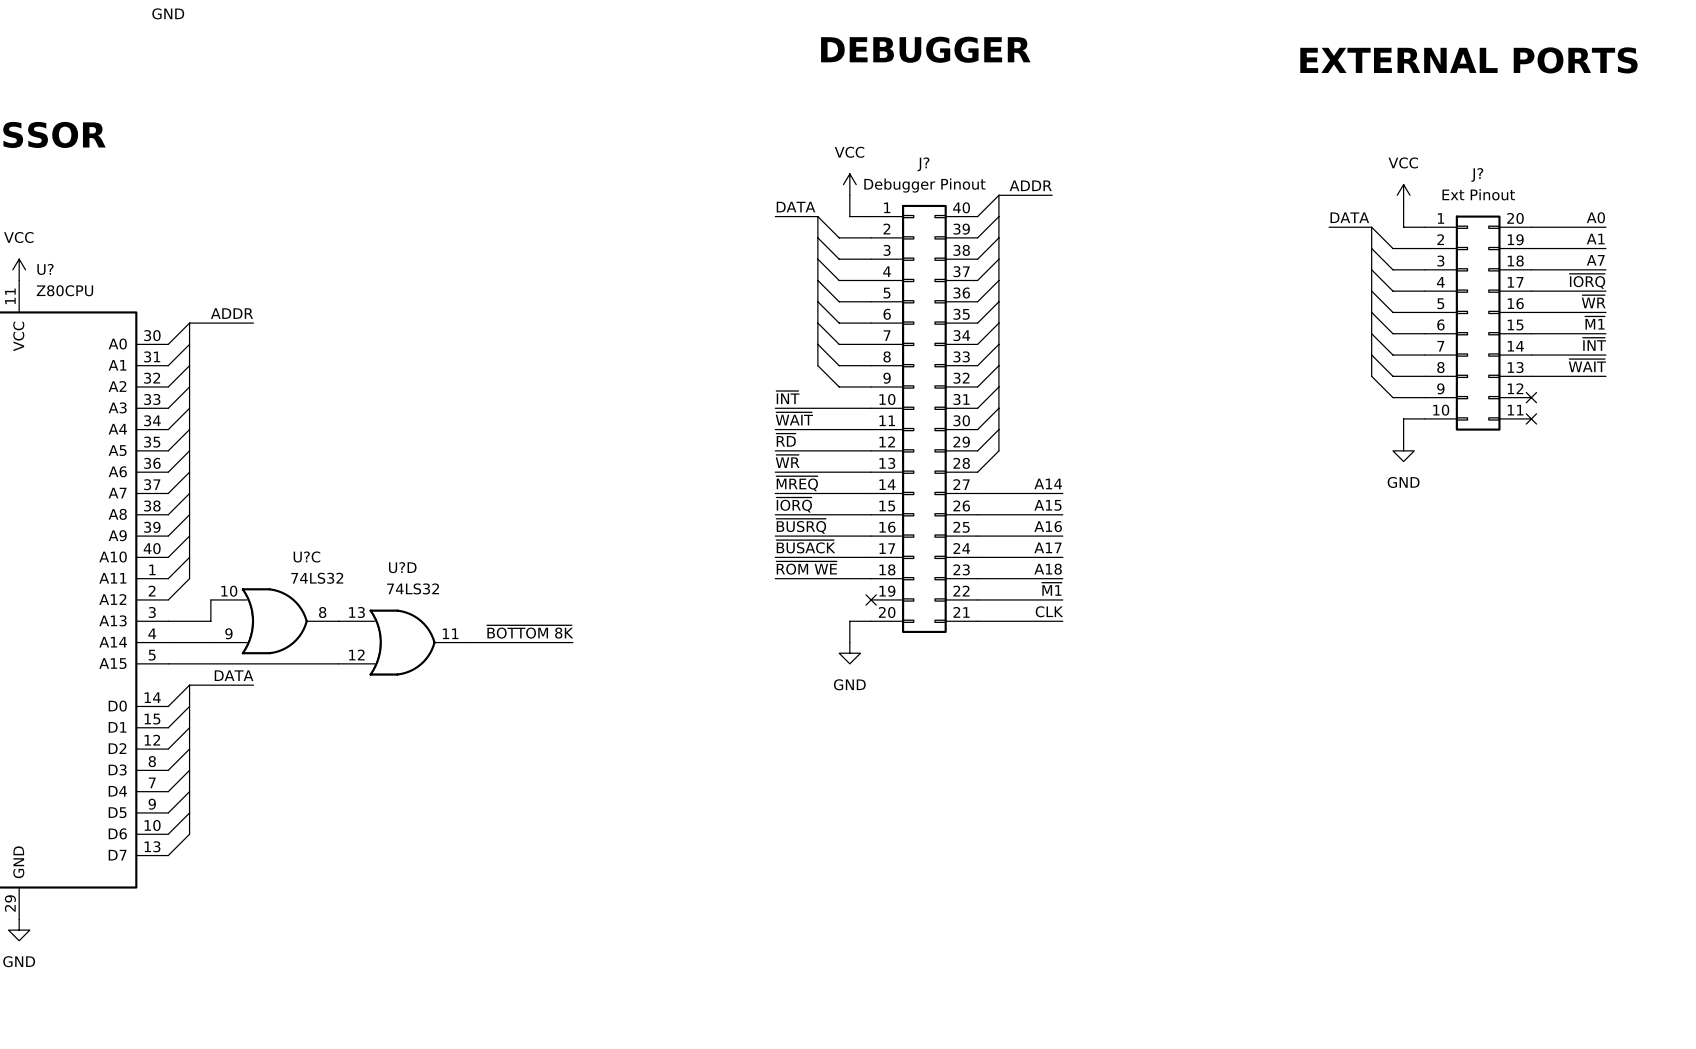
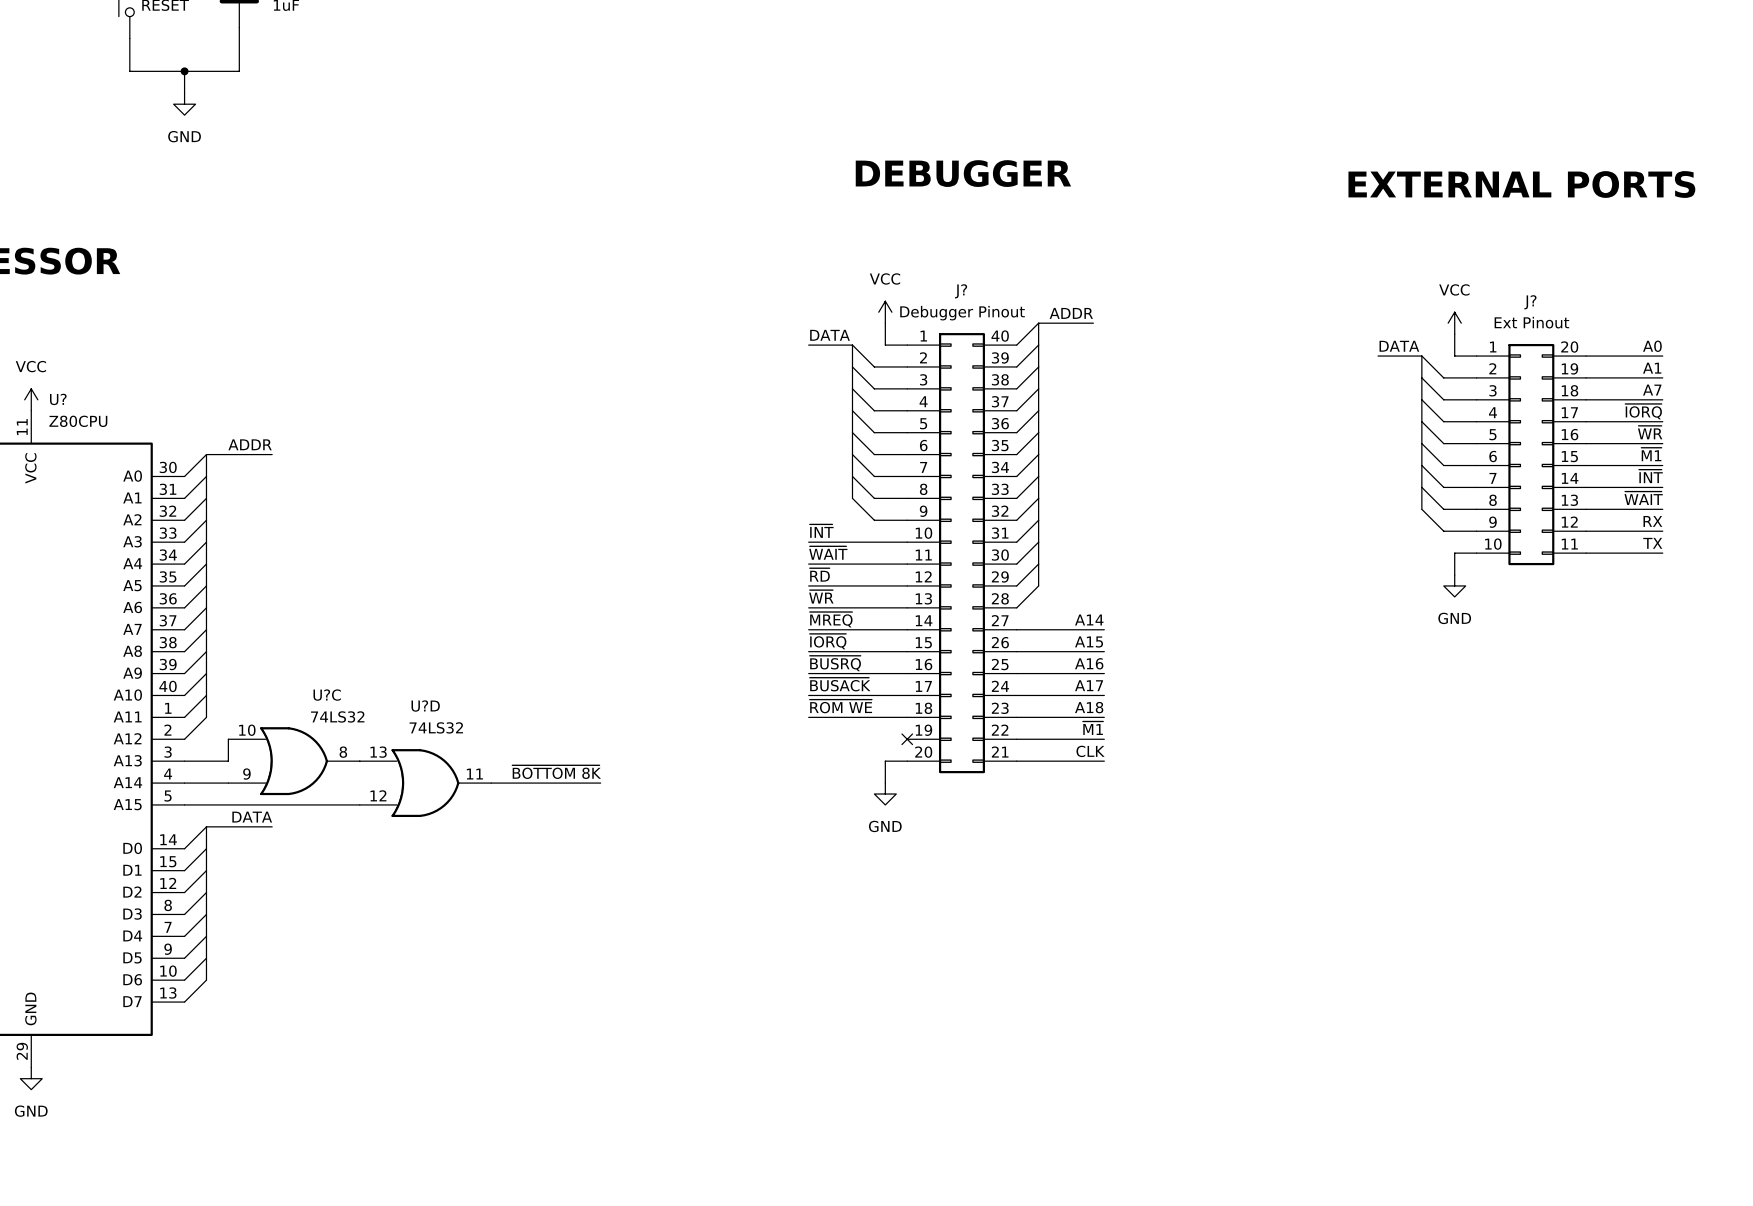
label: none -> RX (1652, 521)
wire: none -> (1586, 531) (1662, 531)
no-connect mark: (1531, 397) -> none
label: none -> TX (1652, 543)
wire: none -> (1586, 553) (1662, 553)
no-connect mark: (1531, 418) -> none

